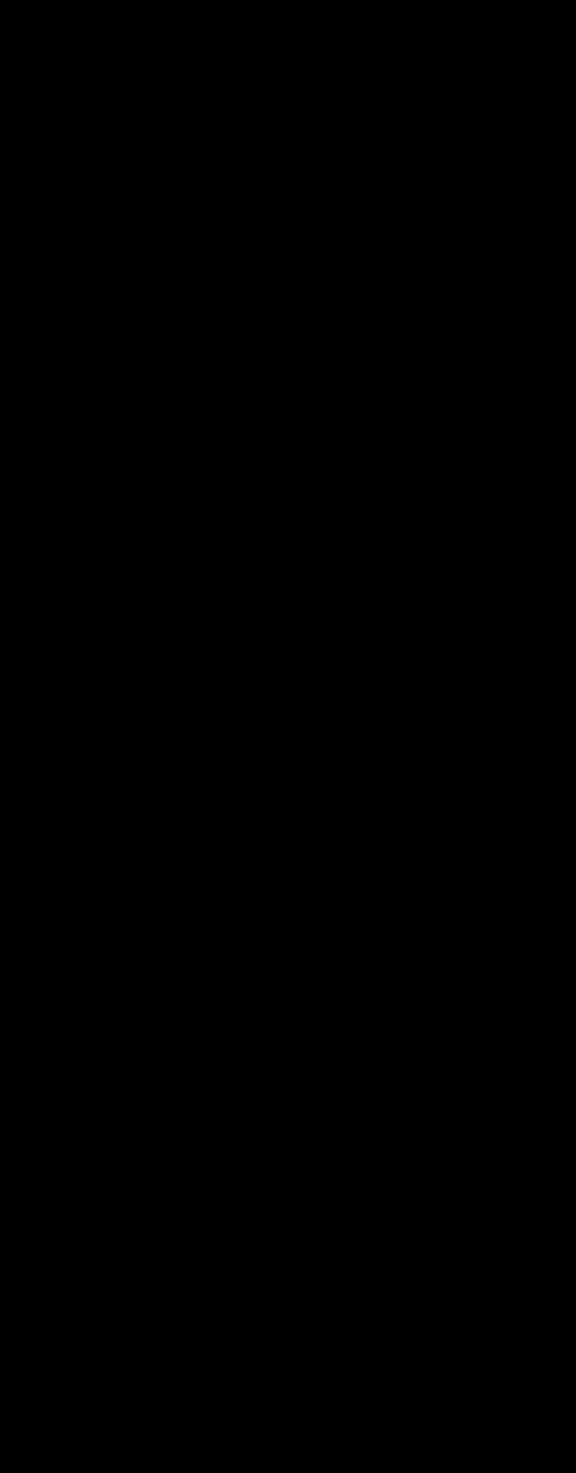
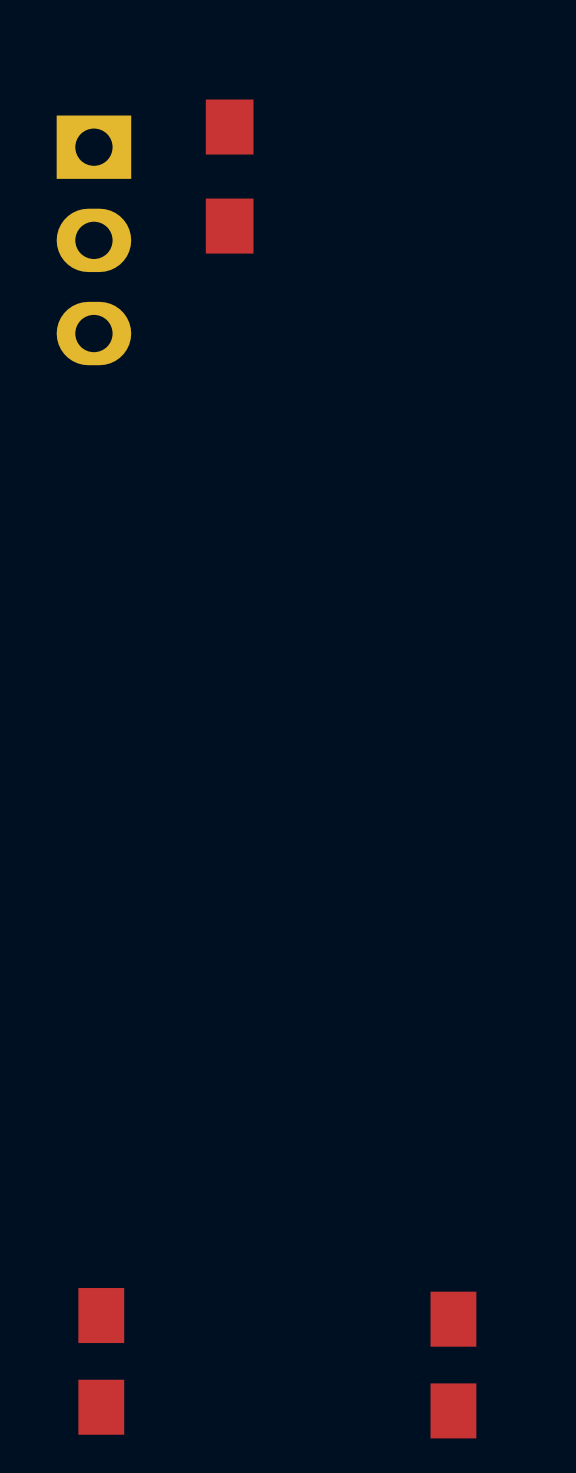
part: none -> (229, 176)
part: none -> (93, 240)
part: none -> (101, 1361)
part: none -> (453, 1365)

